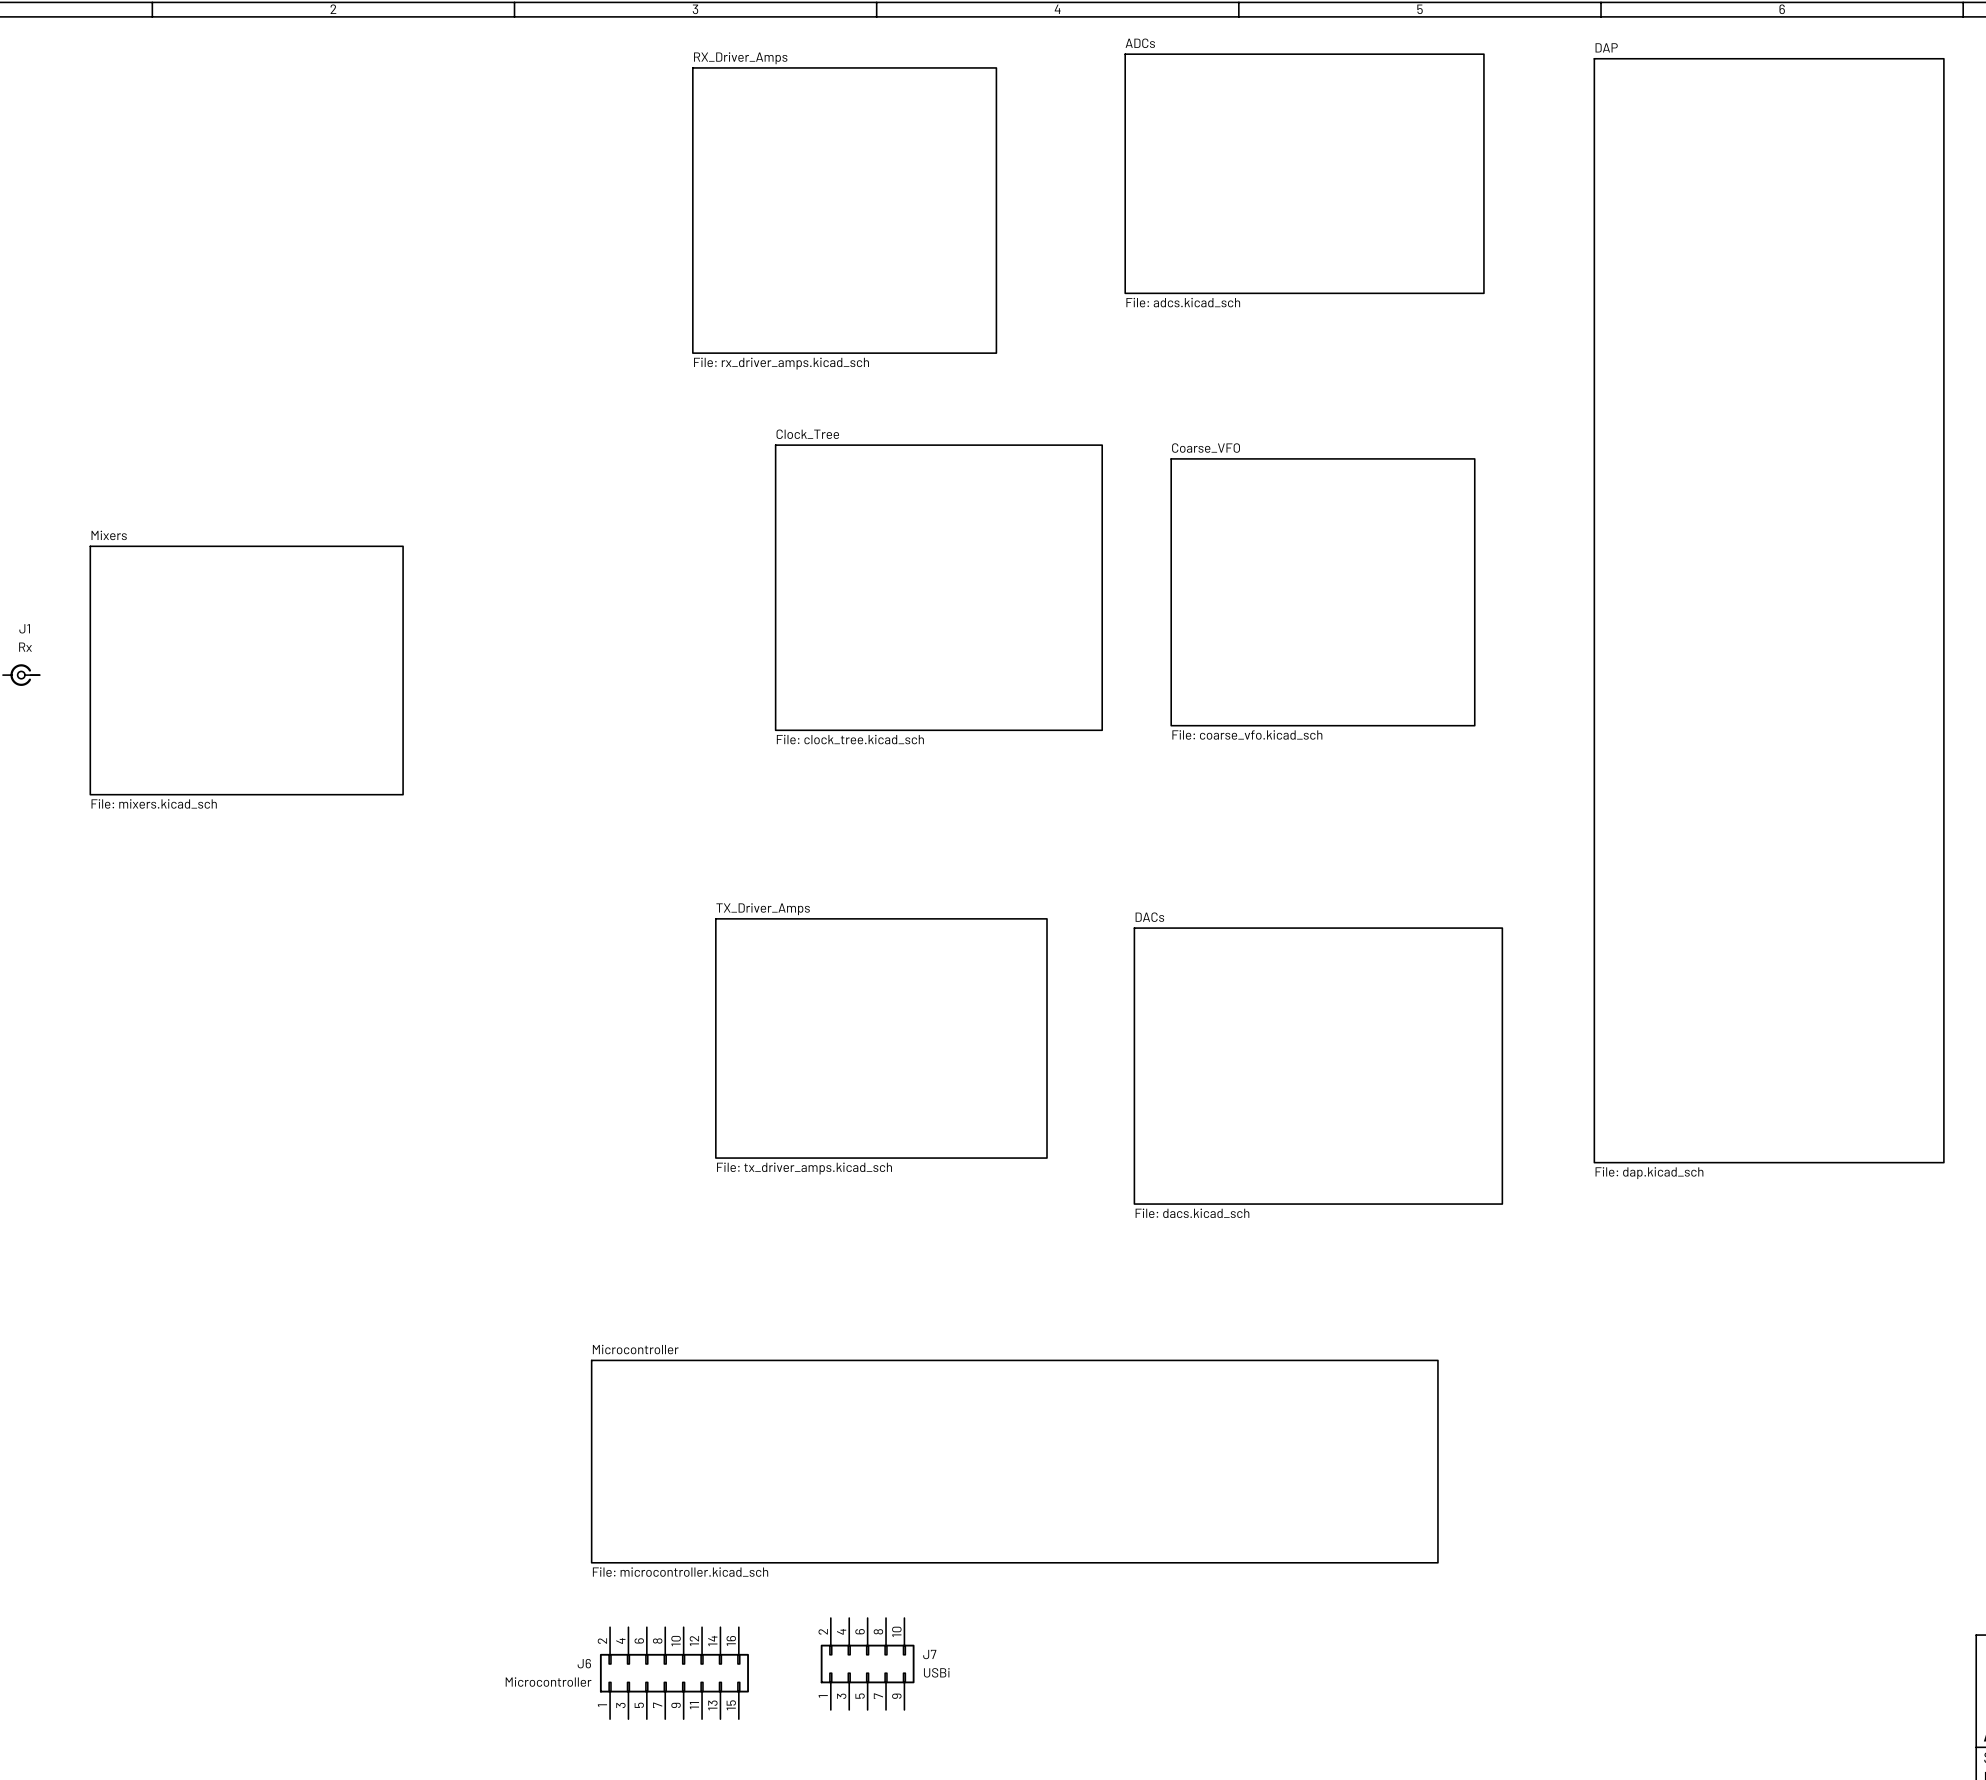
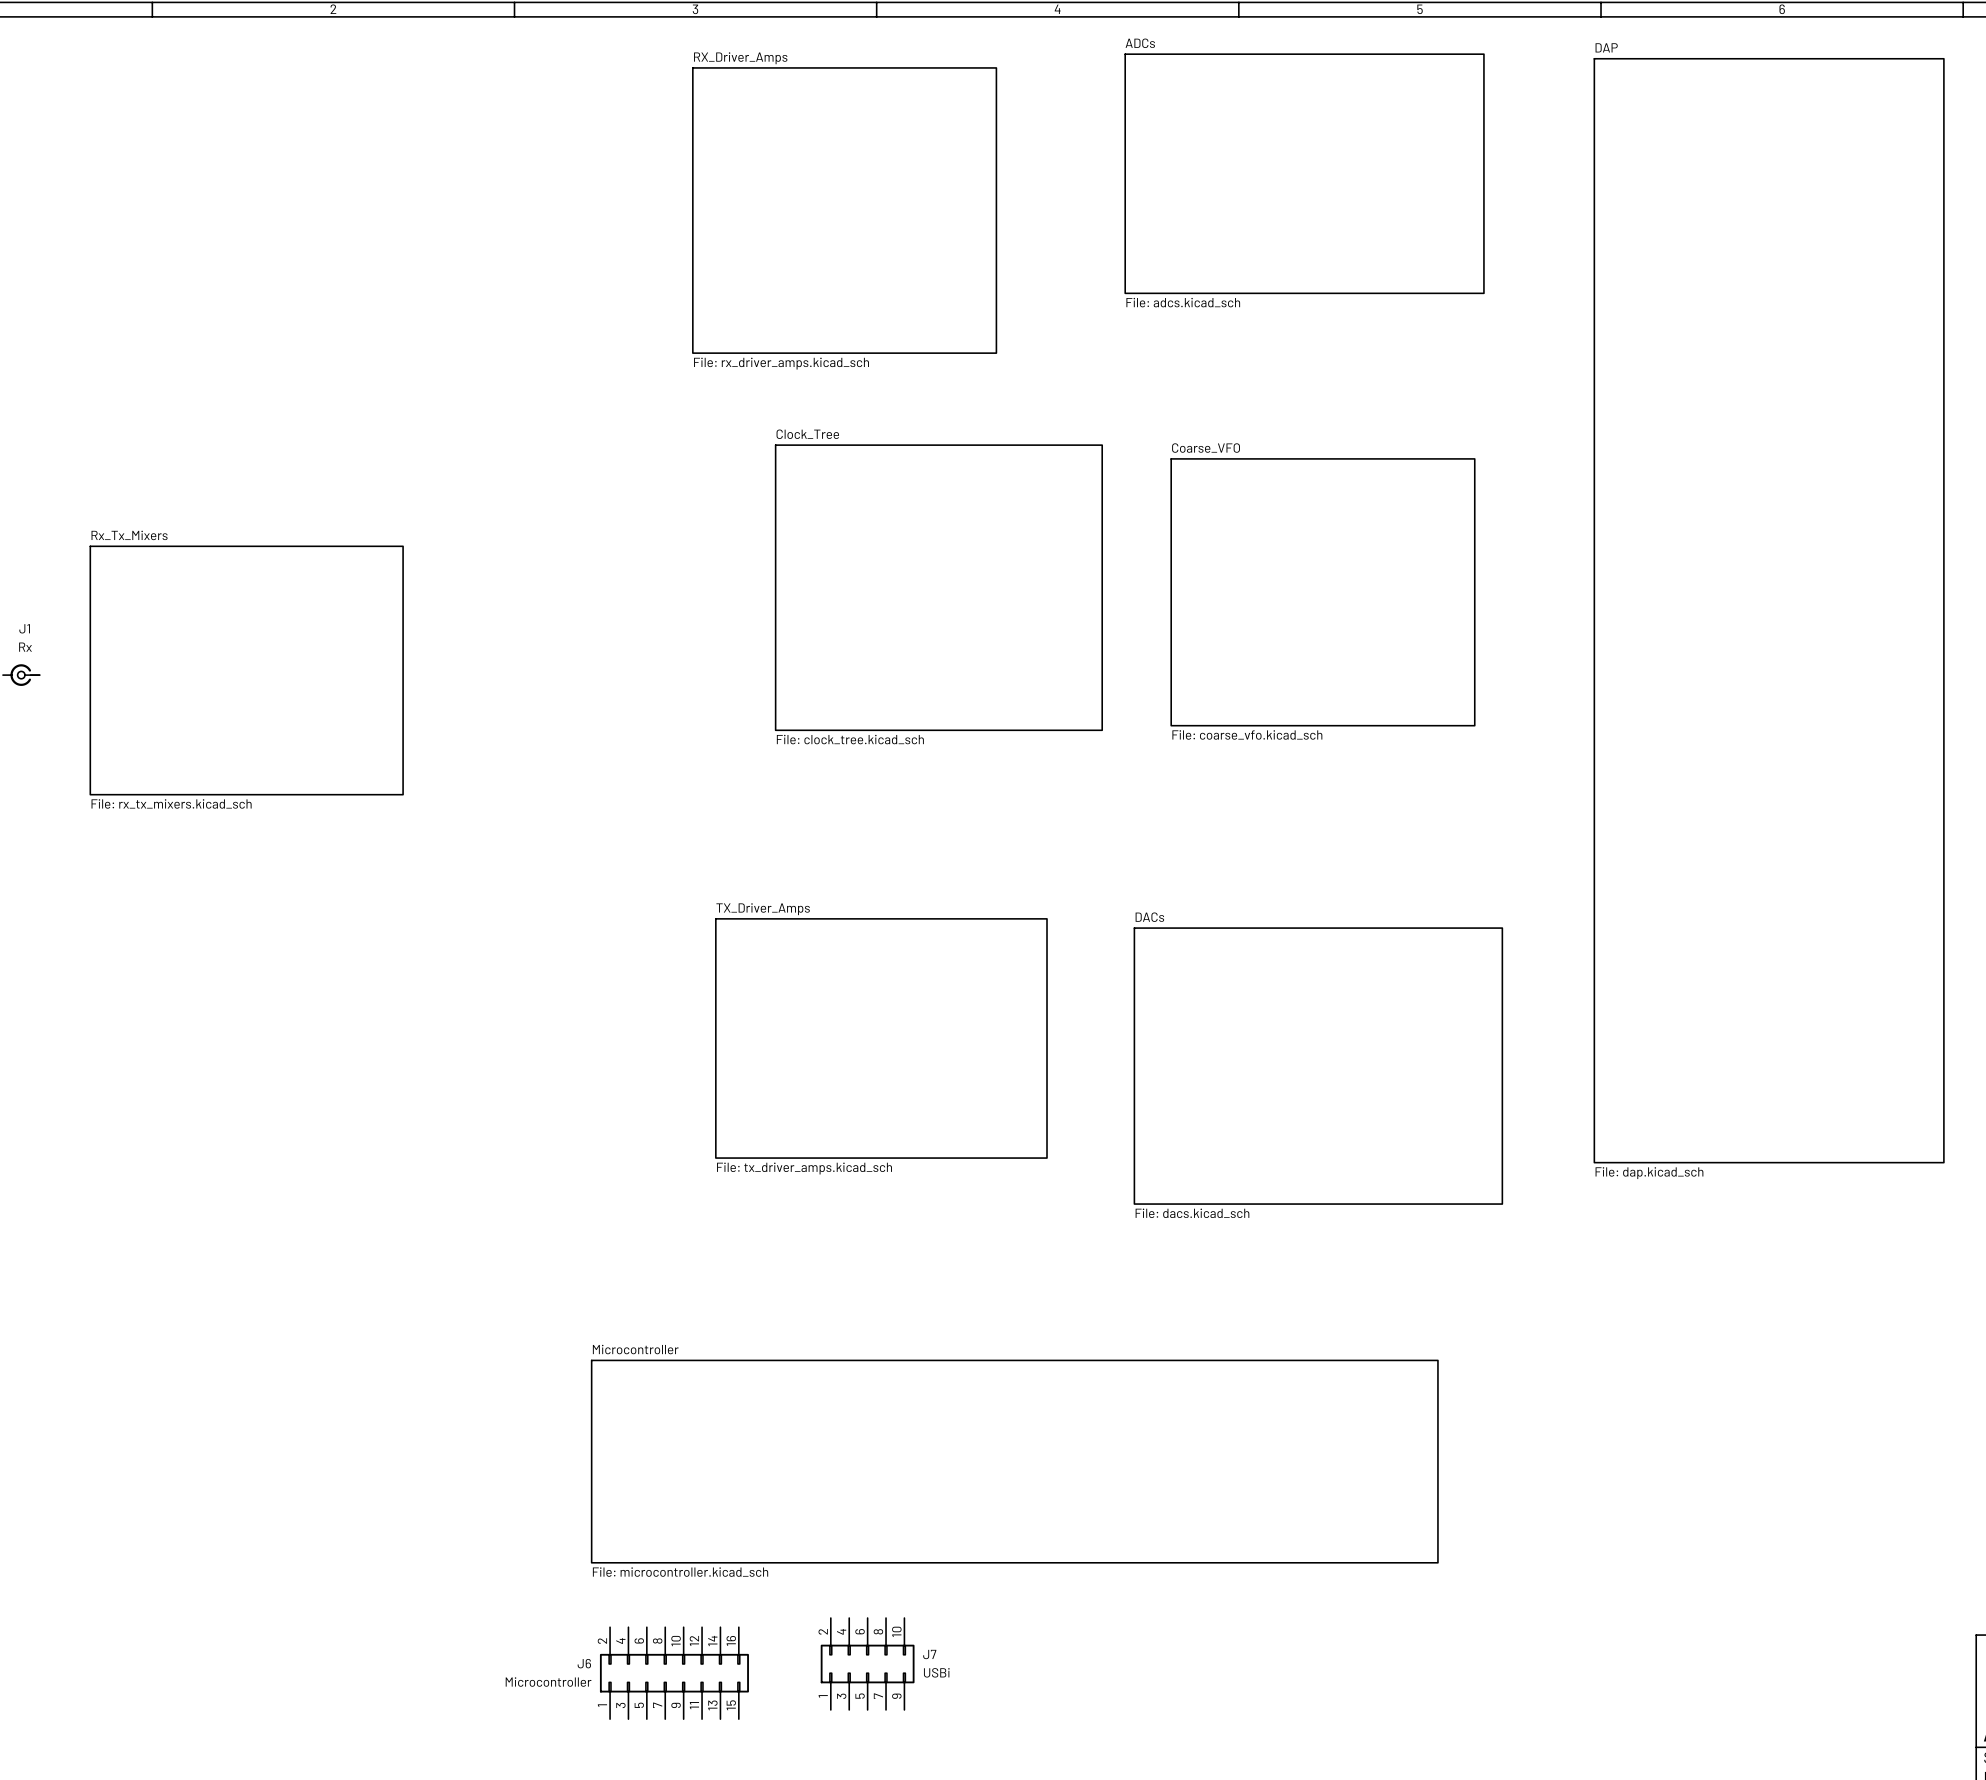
sheet Mixers name: Mixers (109, 535) -> Rx_Tx_Mixers (129, 535)
sheet Mixers value: File: mixers.kicad_sch (154, 803) -> File: rx_tx_mixers.kicad_sch (171, 803)

